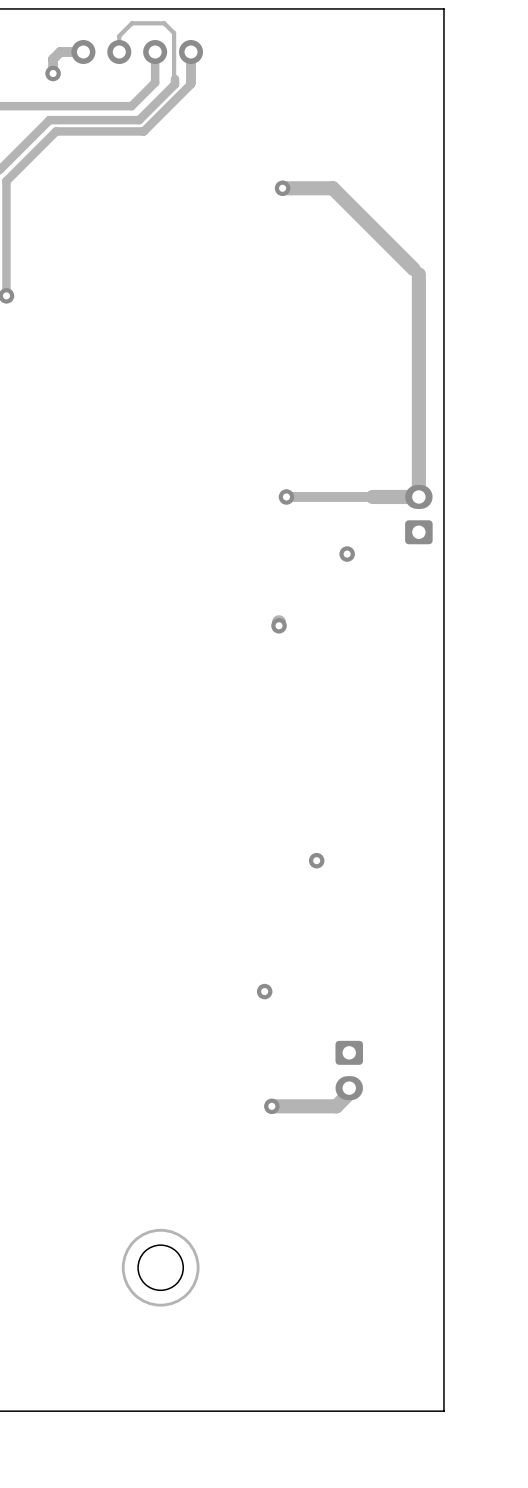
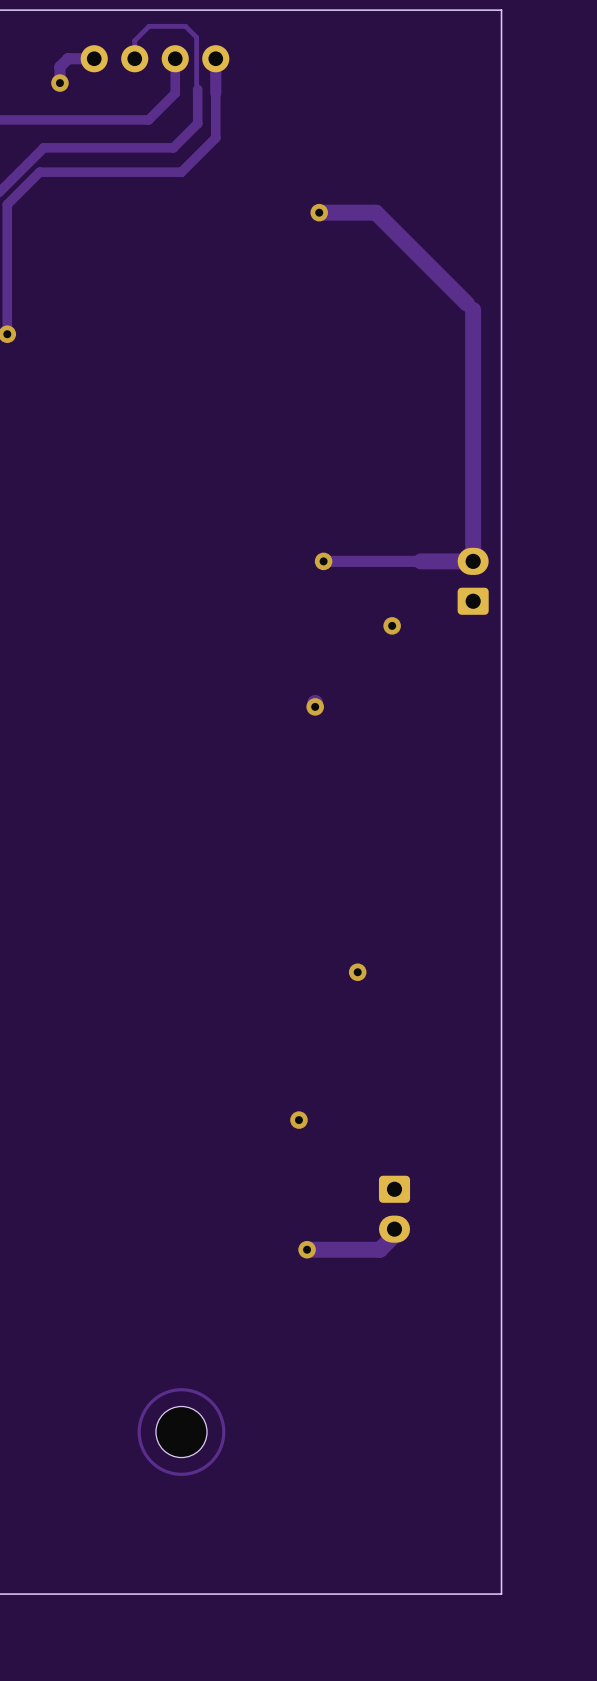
track: (175, 84) (139, 120) (49, 120) (38, 130) -> (197, 95) (197, 123) (173, 147) (43, 147)
track: (191, 84) (143, 131) (56, 131) (35, 152) -> (215, 95) (215, 137) (181, 172) (39, 172)

